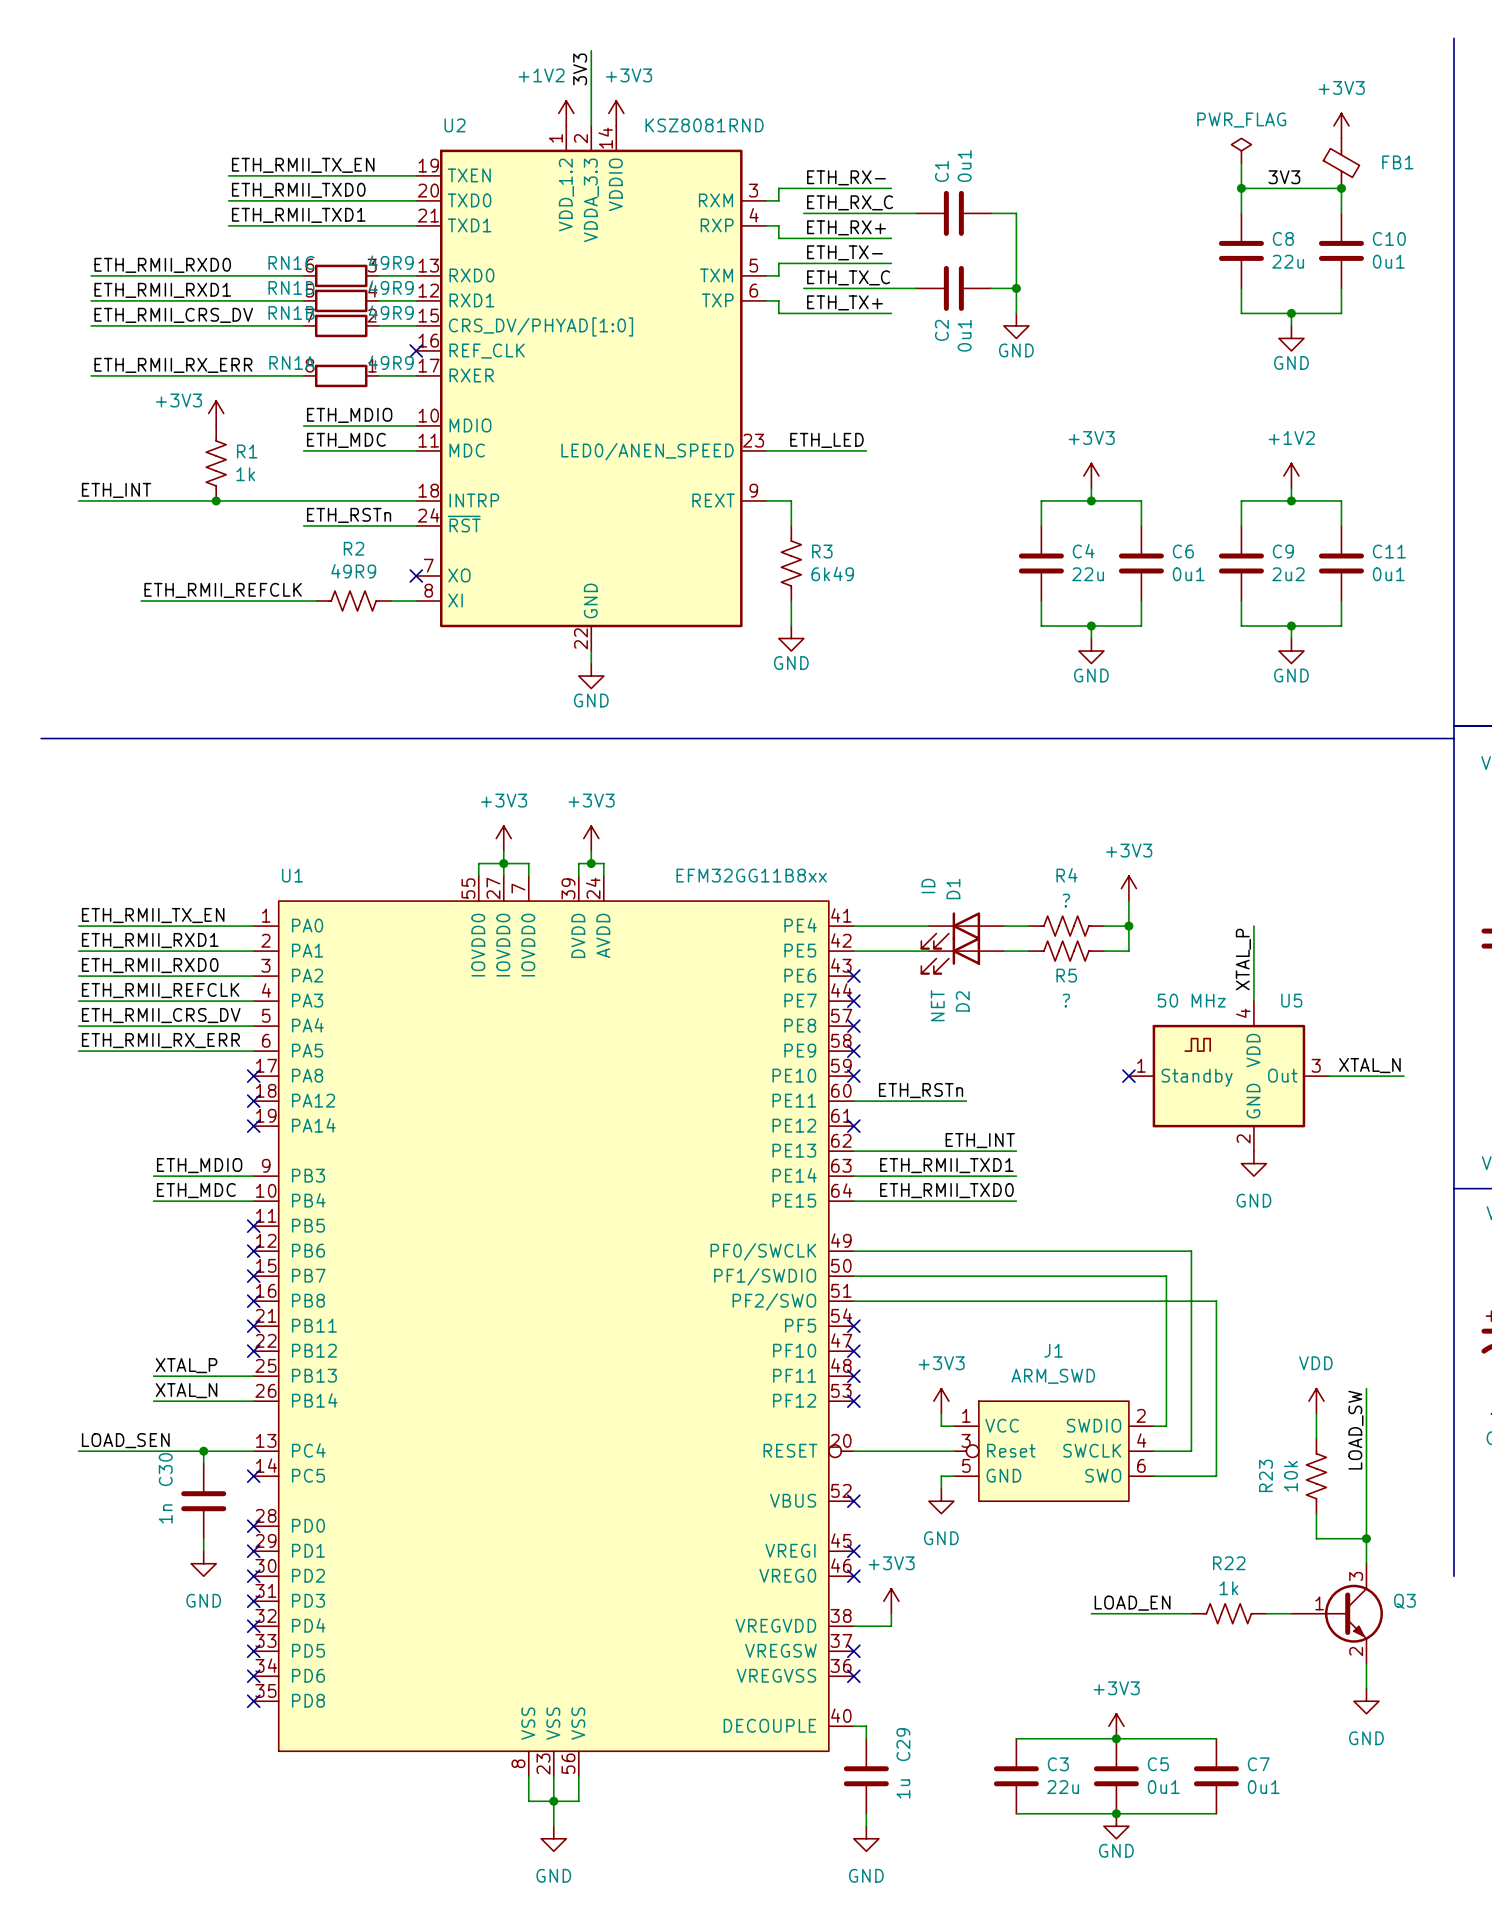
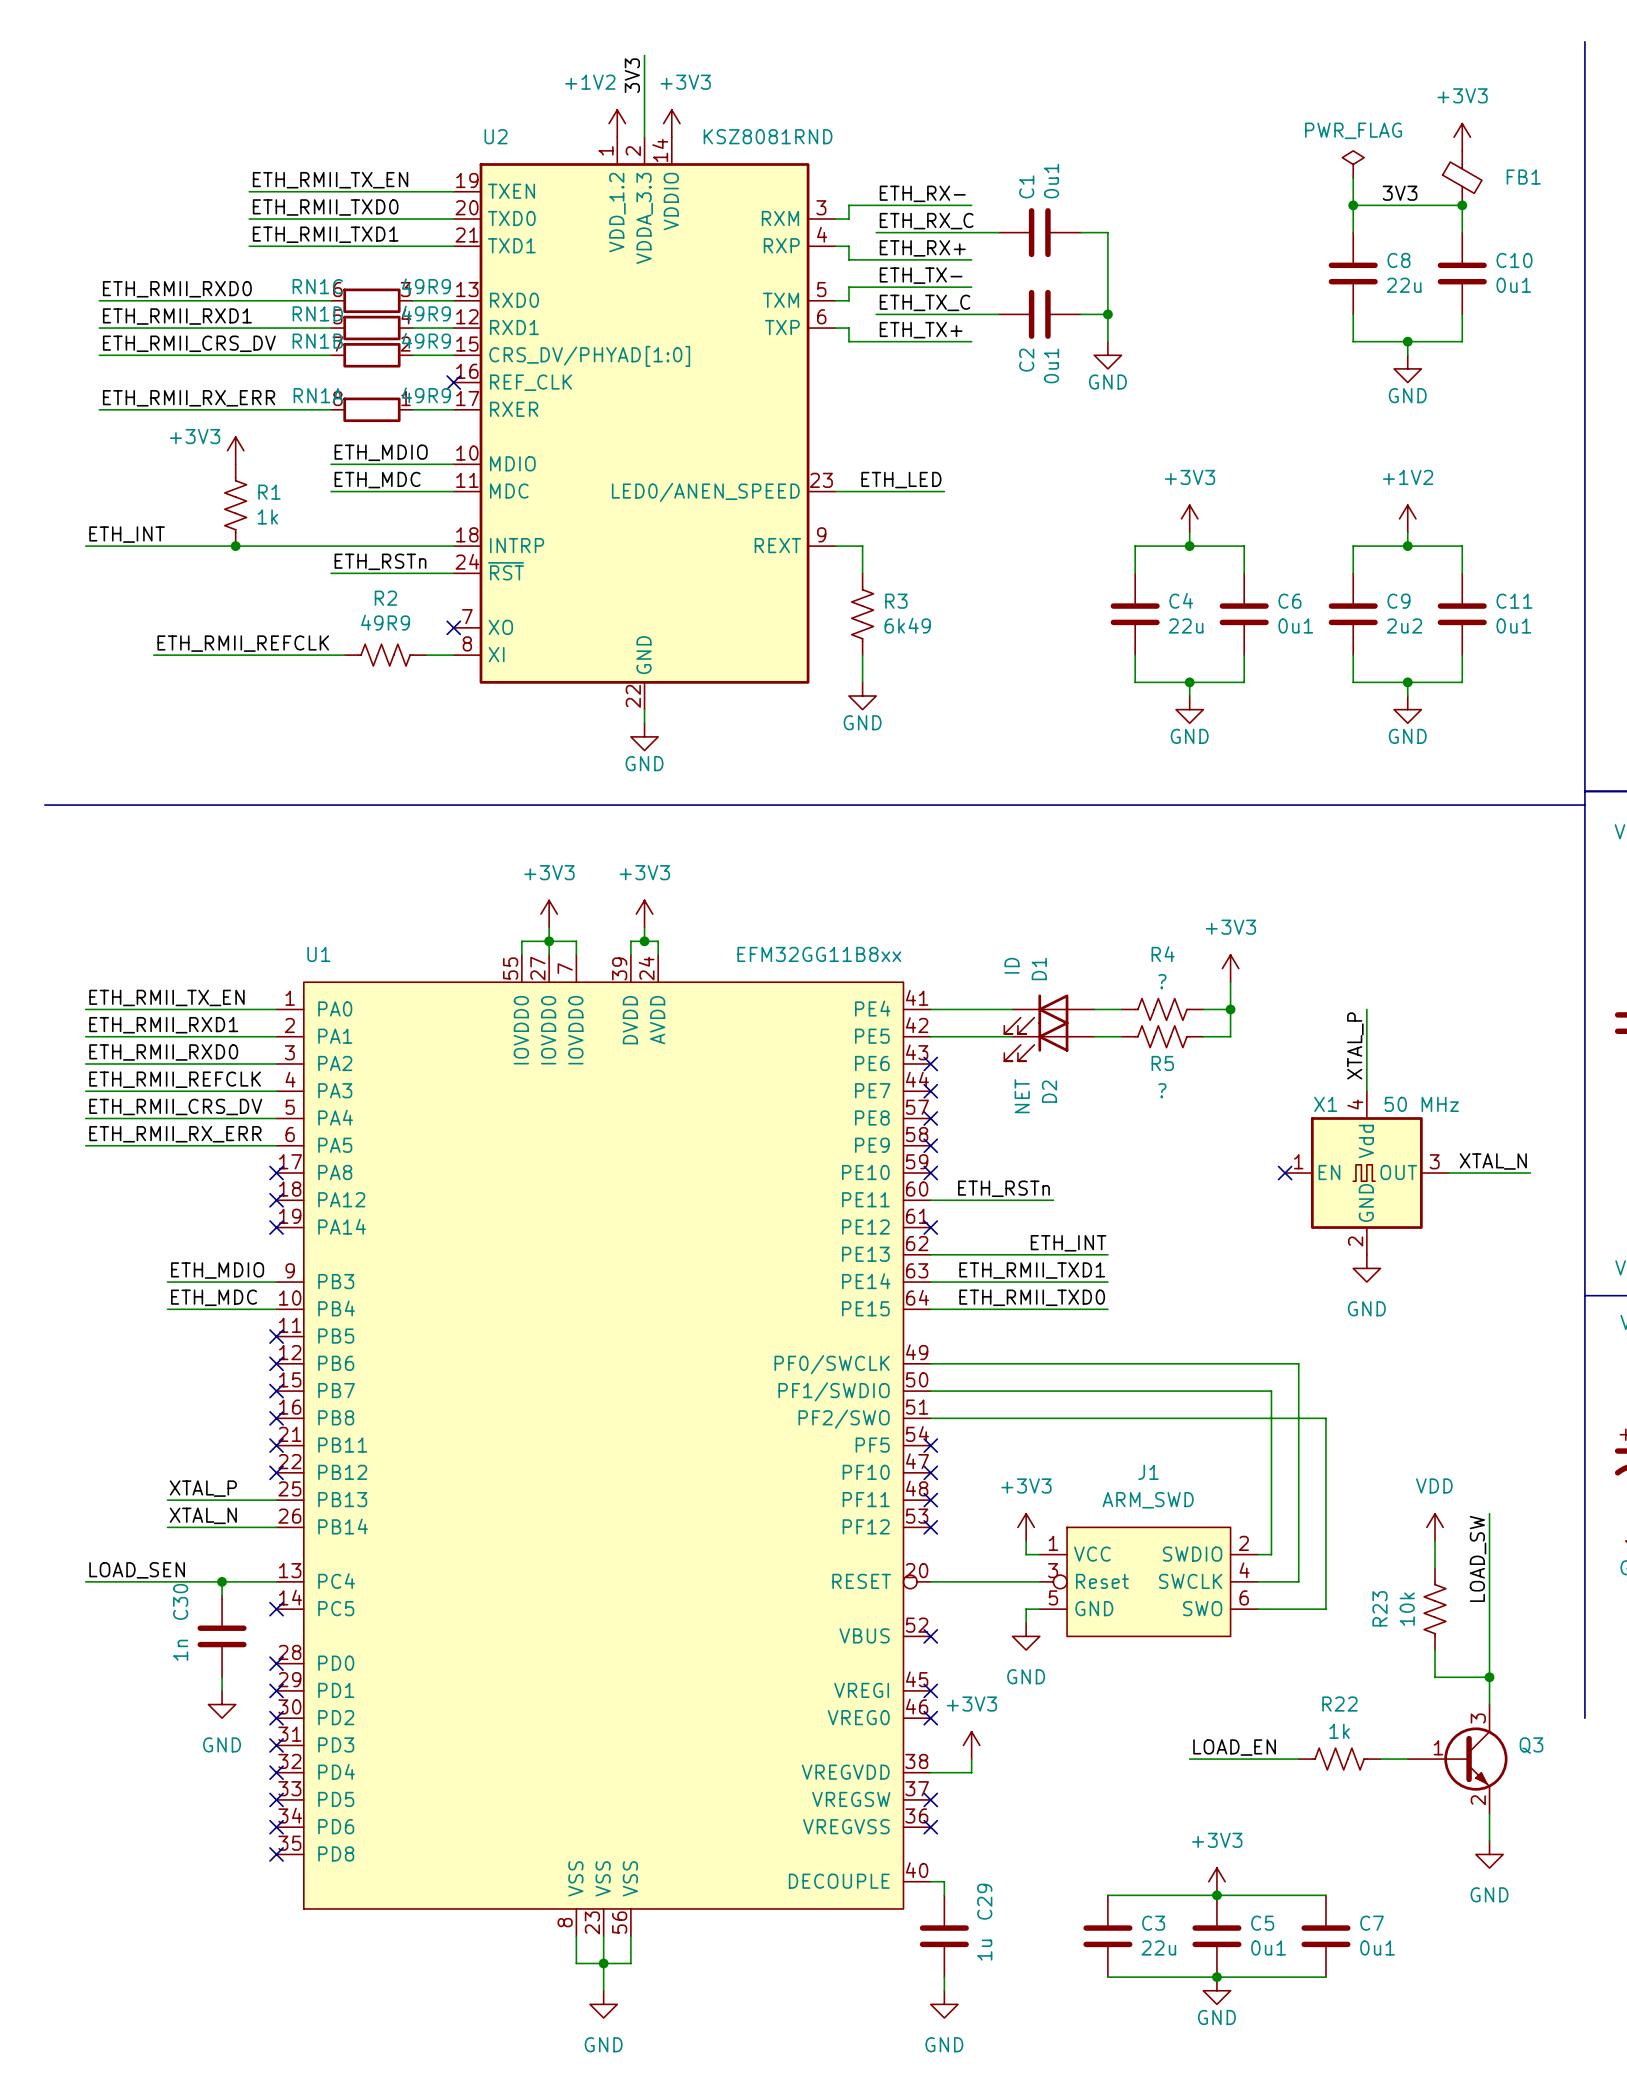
no-connect mark position: (1128, 1076) -> (1285, 1173)
U5: 50 MHz (1228, 1076) -> none
X1: none -> 50 MHz (1366, 1173)

